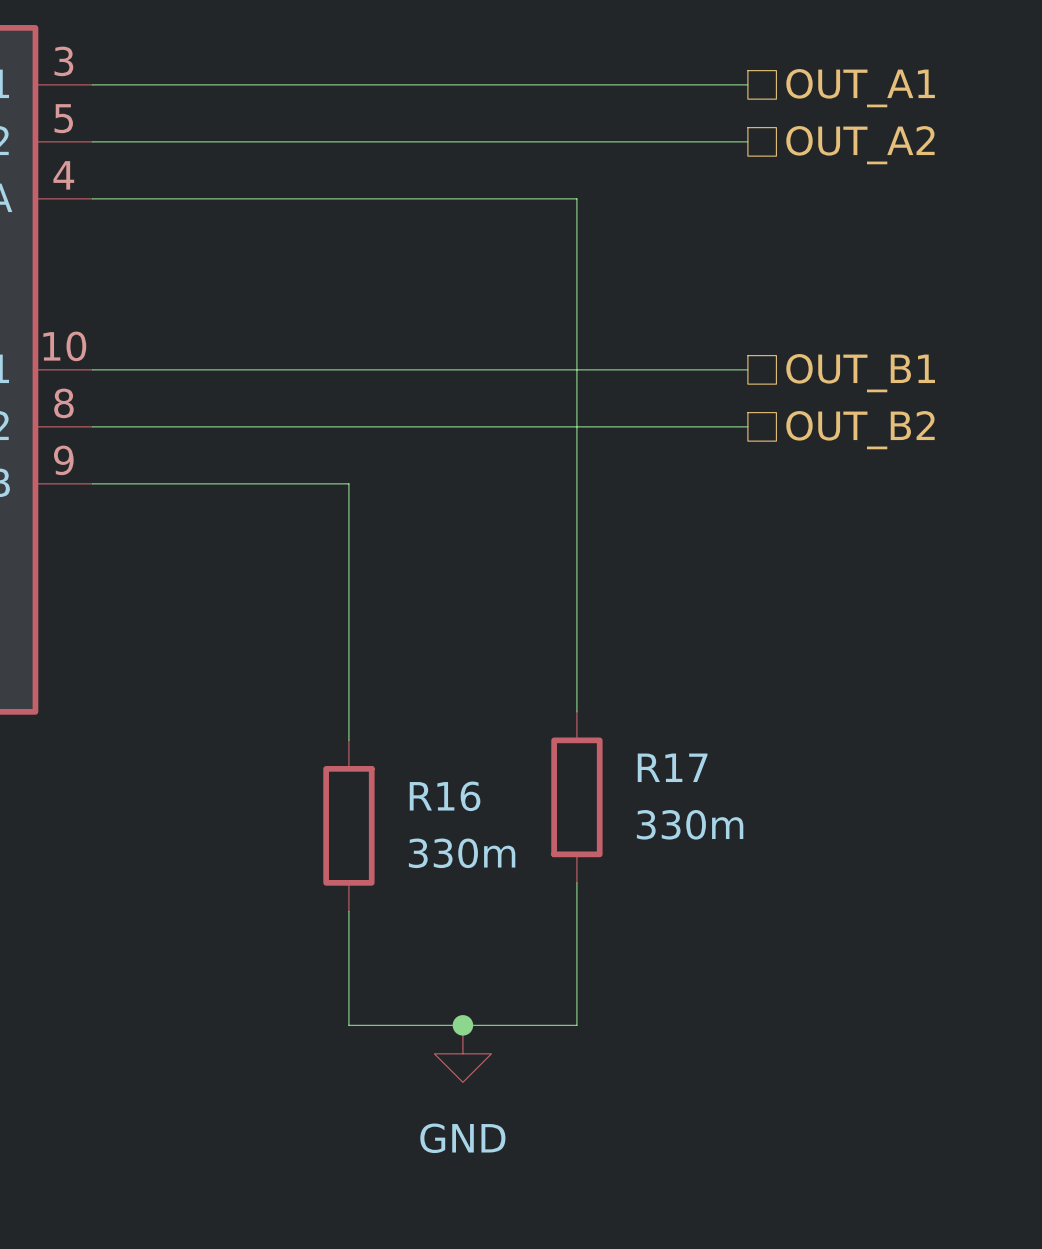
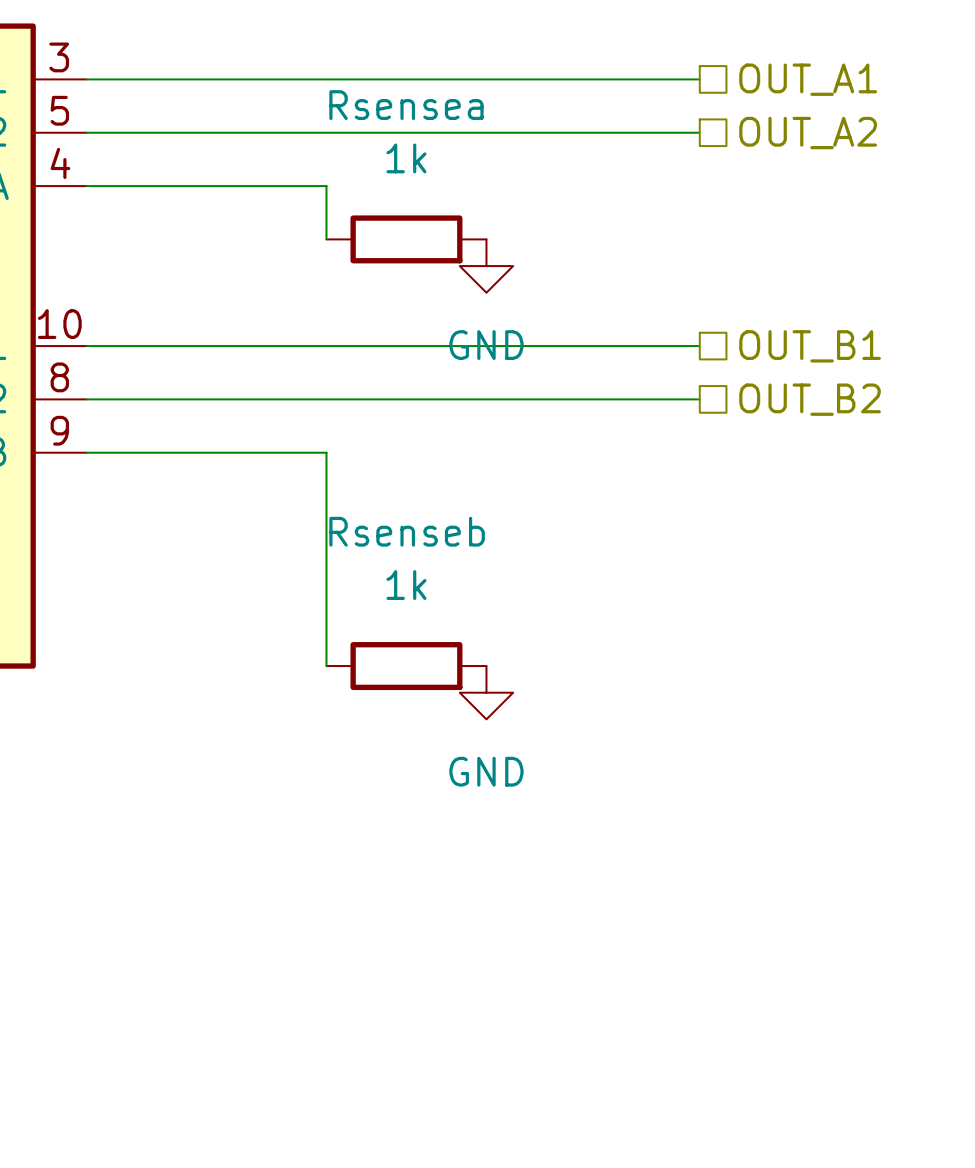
wire: (348, 198) (576, 198) (576, 711) -> (326, 186) (326, 239)
Rsensea: none -> 1k (406, 239)
power symbol: none -> GND (486, 266)
wire: (348, 711) (348, 740) -> none
Rsenseb: none -> 1k (406, 666)
R17: 330m (576, 797) -> none
R16: 330m (348, 825) -> none
wire: (576, 882) (576, 1025) (348, 1025) (348, 911) -> none
junction: (462, 1025) -> none
power symbol position: GND (462, 1053) -> GND (486, 692)

